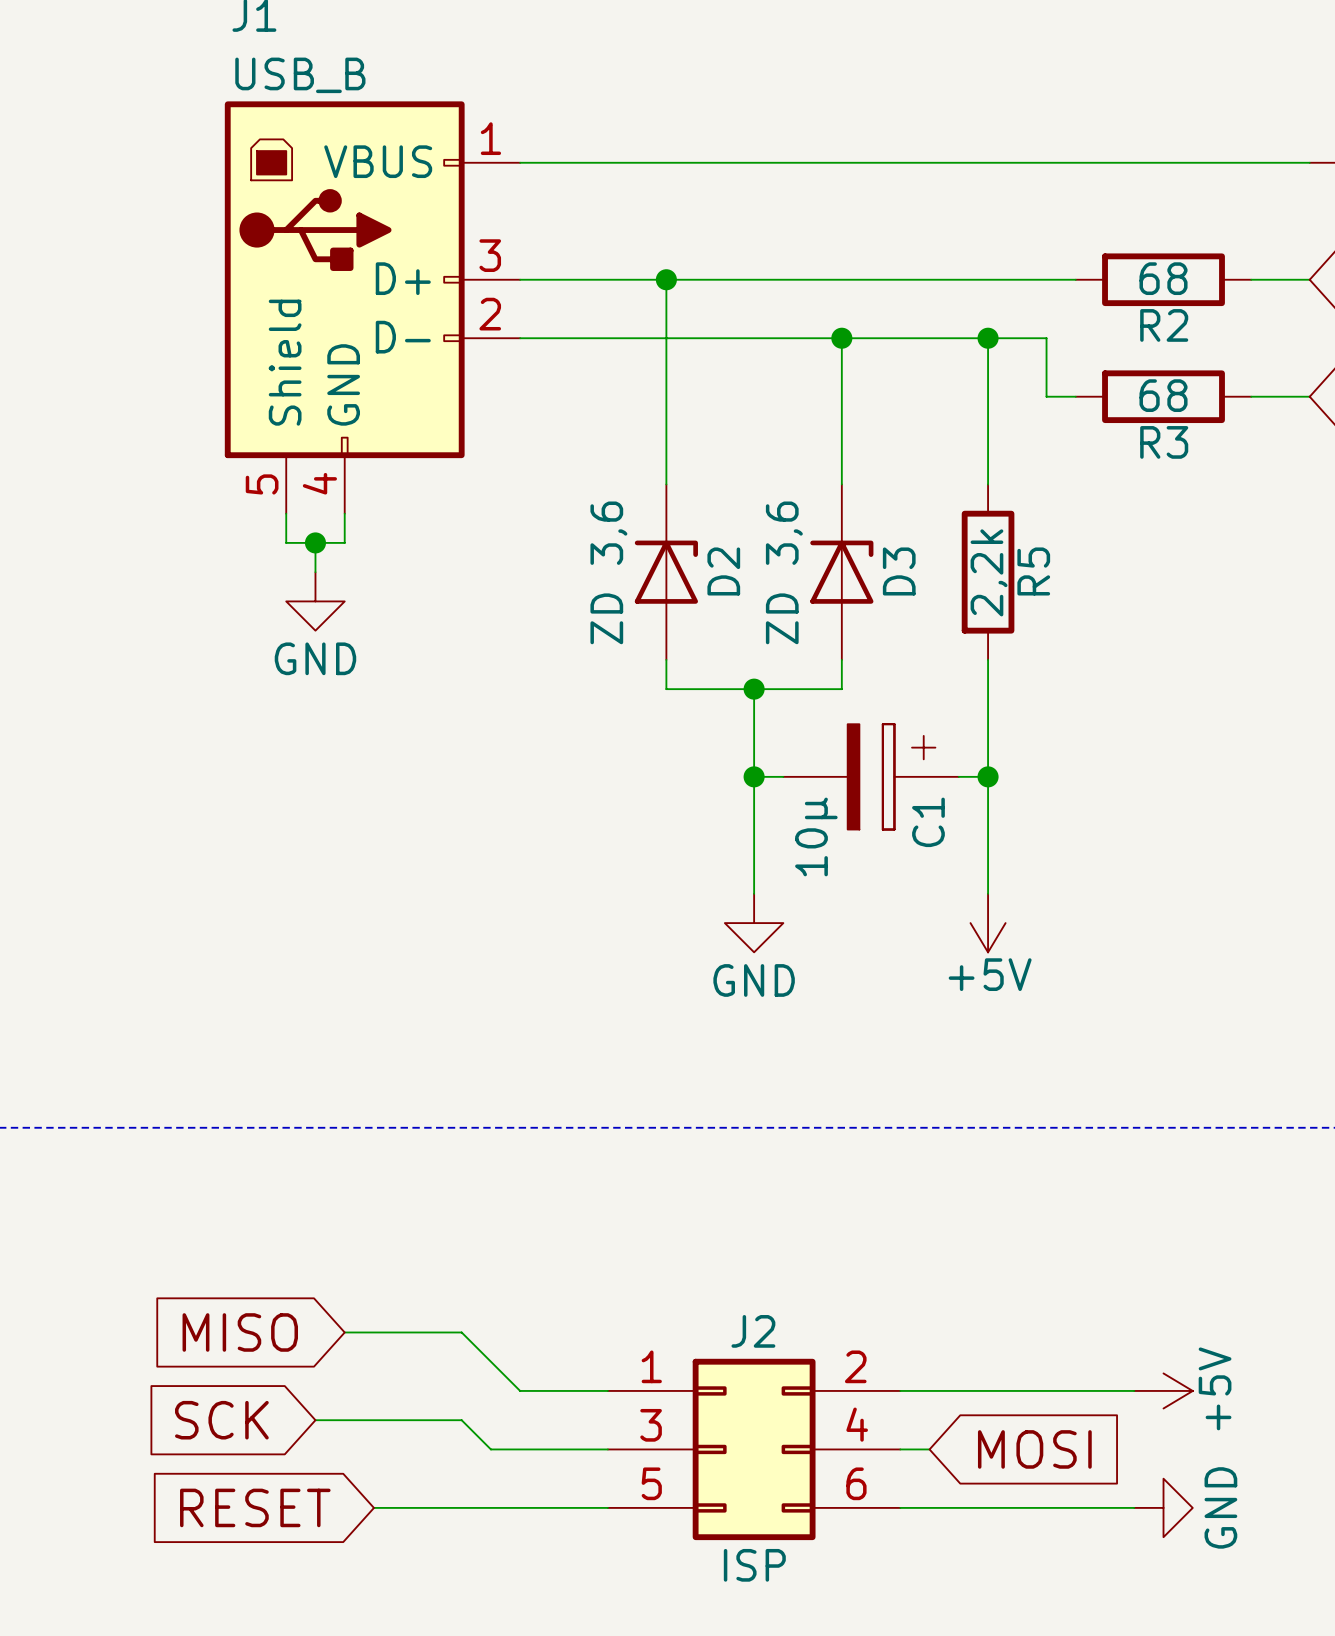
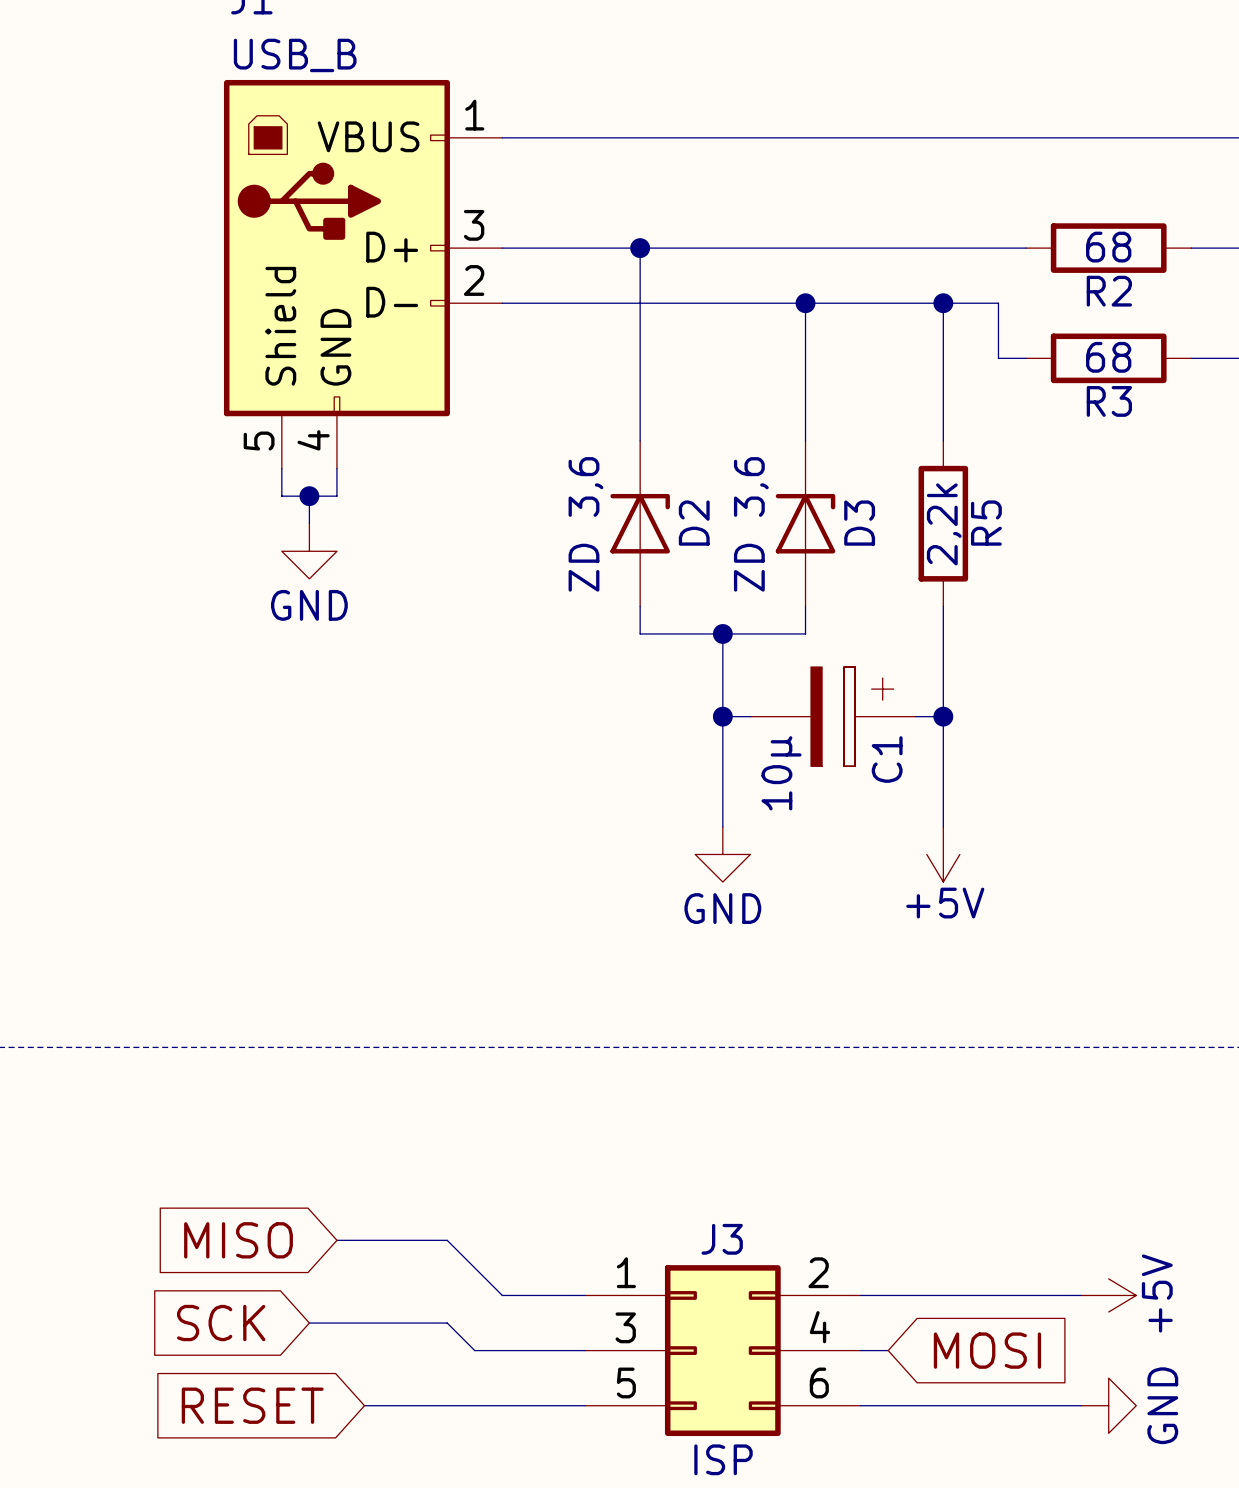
J2 name: J2 (753, 1331) -> J3 (722, 1239)

